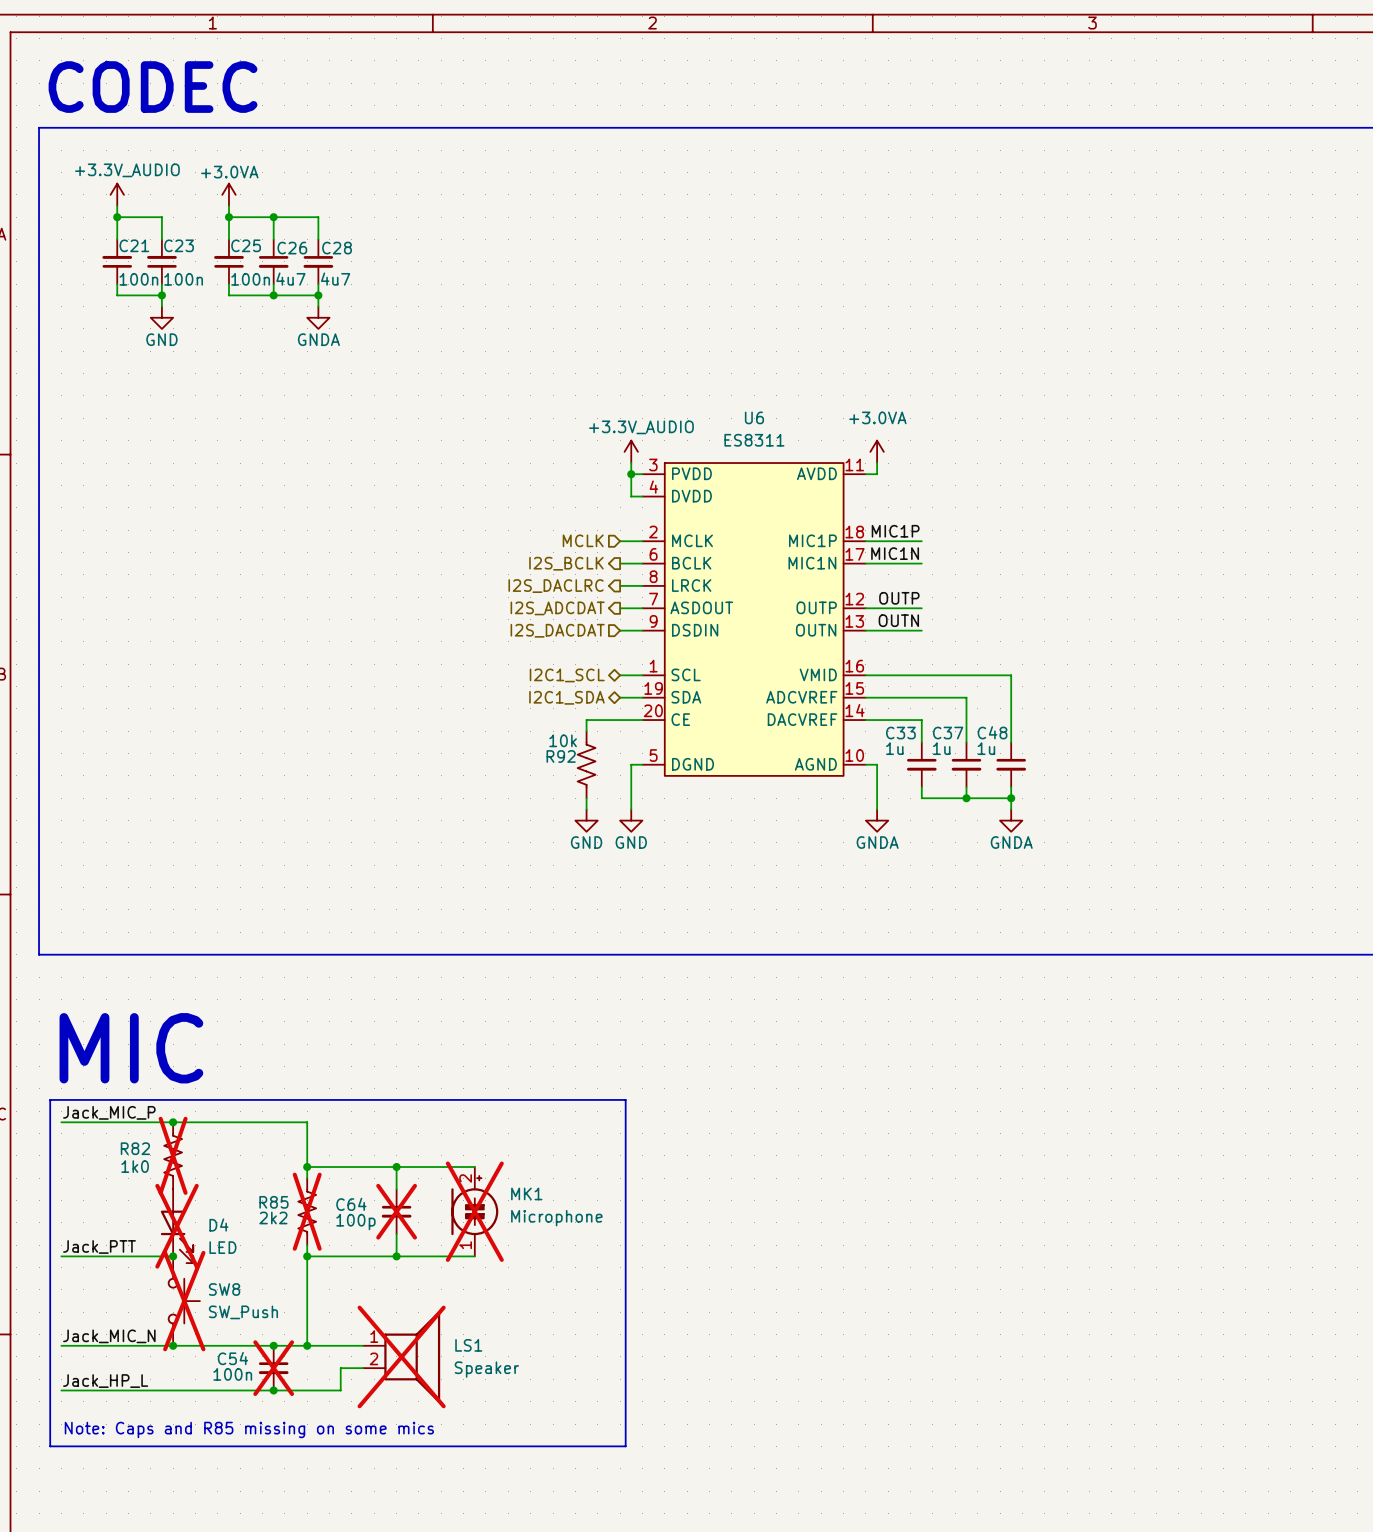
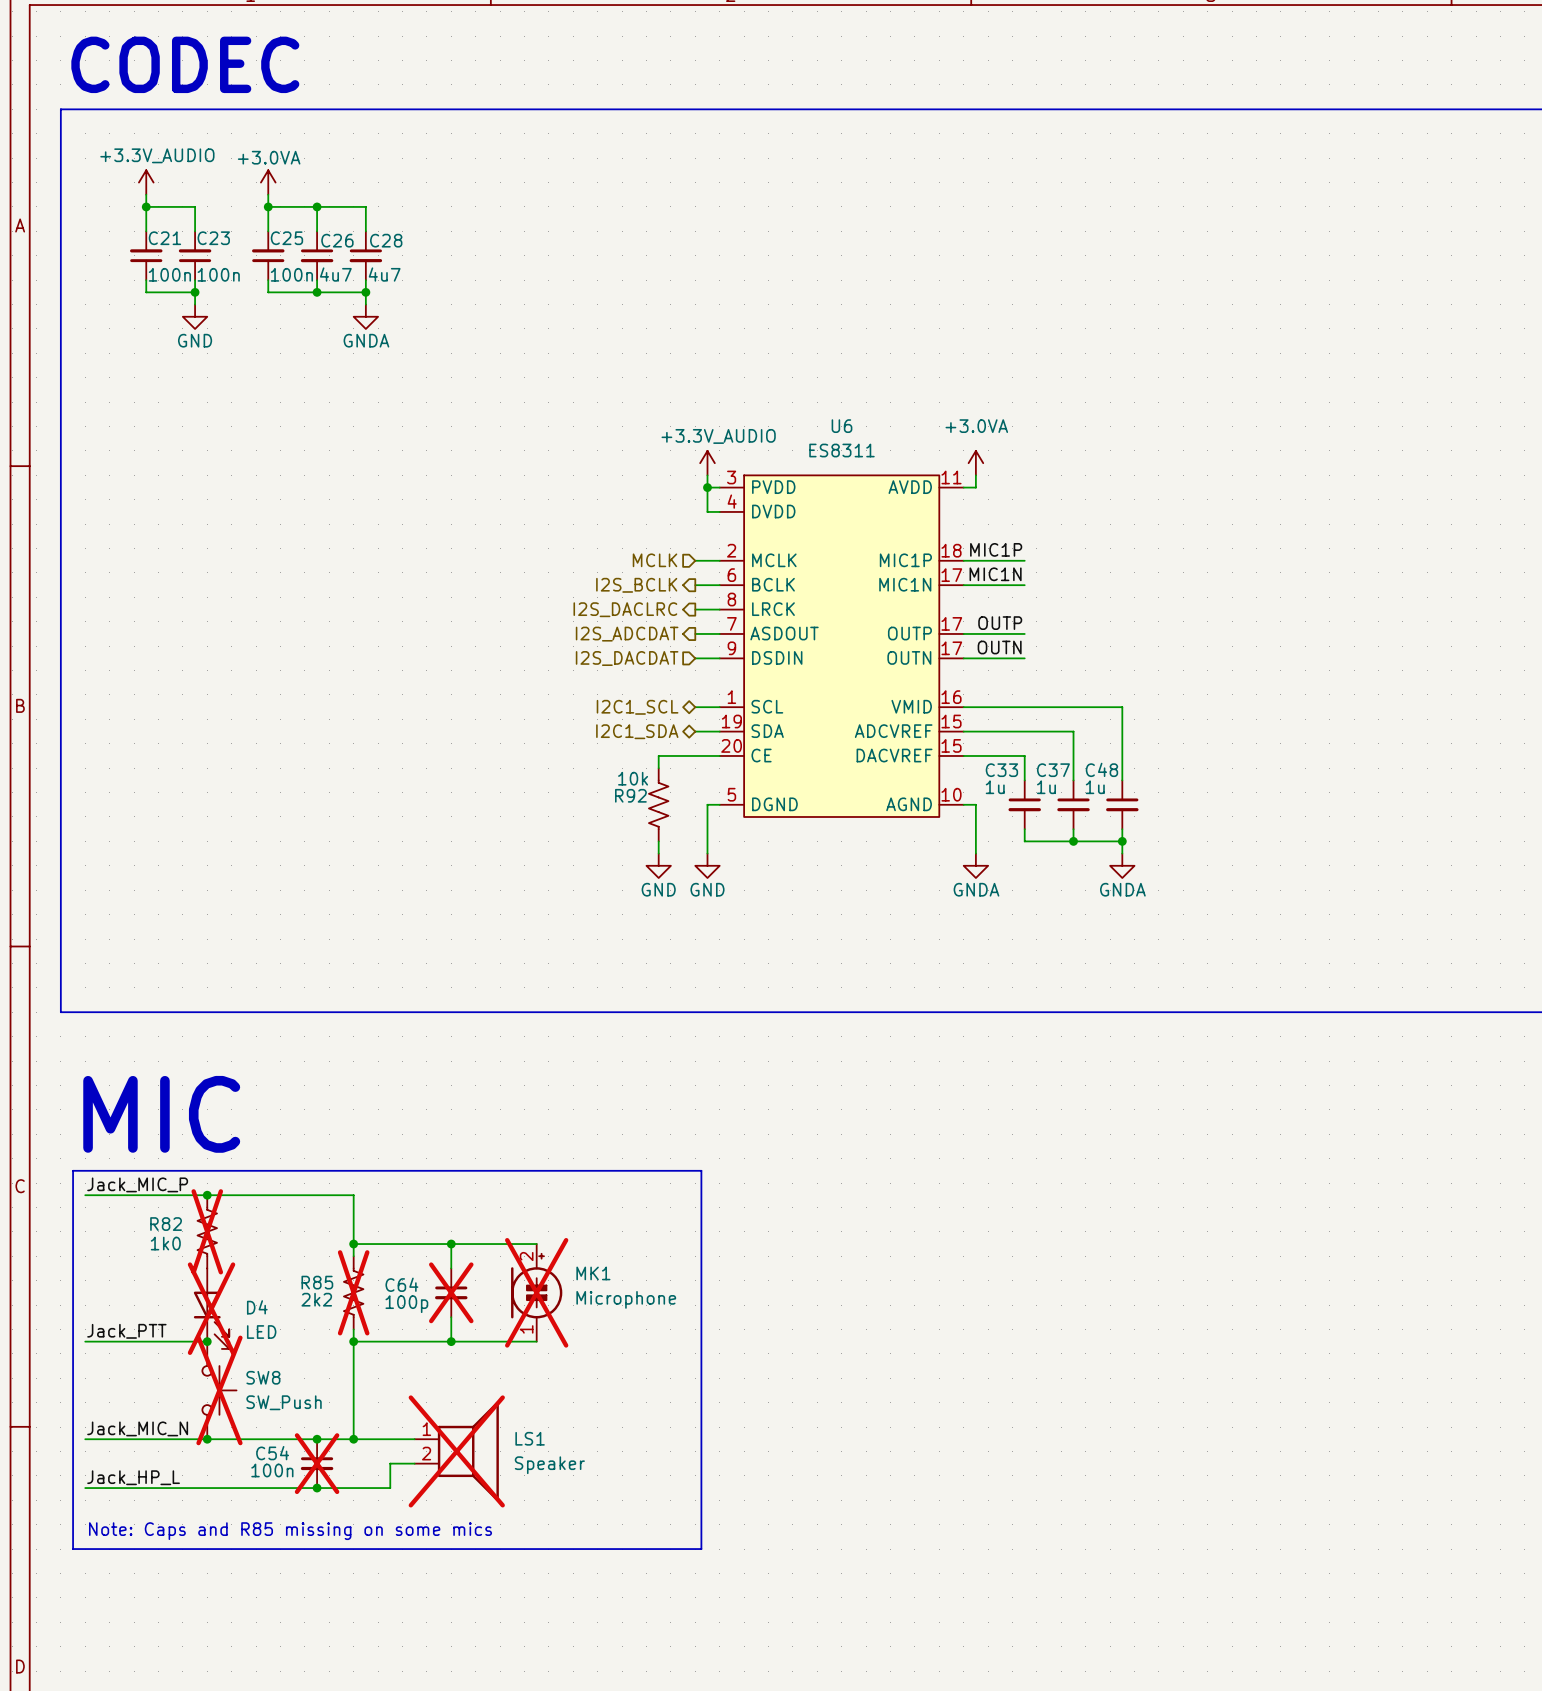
U6 pin number: 12 (854, 599) -> 17 (951, 623)
U6 pin number: 13 (854, 621) -> 17 (951, 648)
U6 pin number: 14 (855, 710) -> 15 (951, 745)

